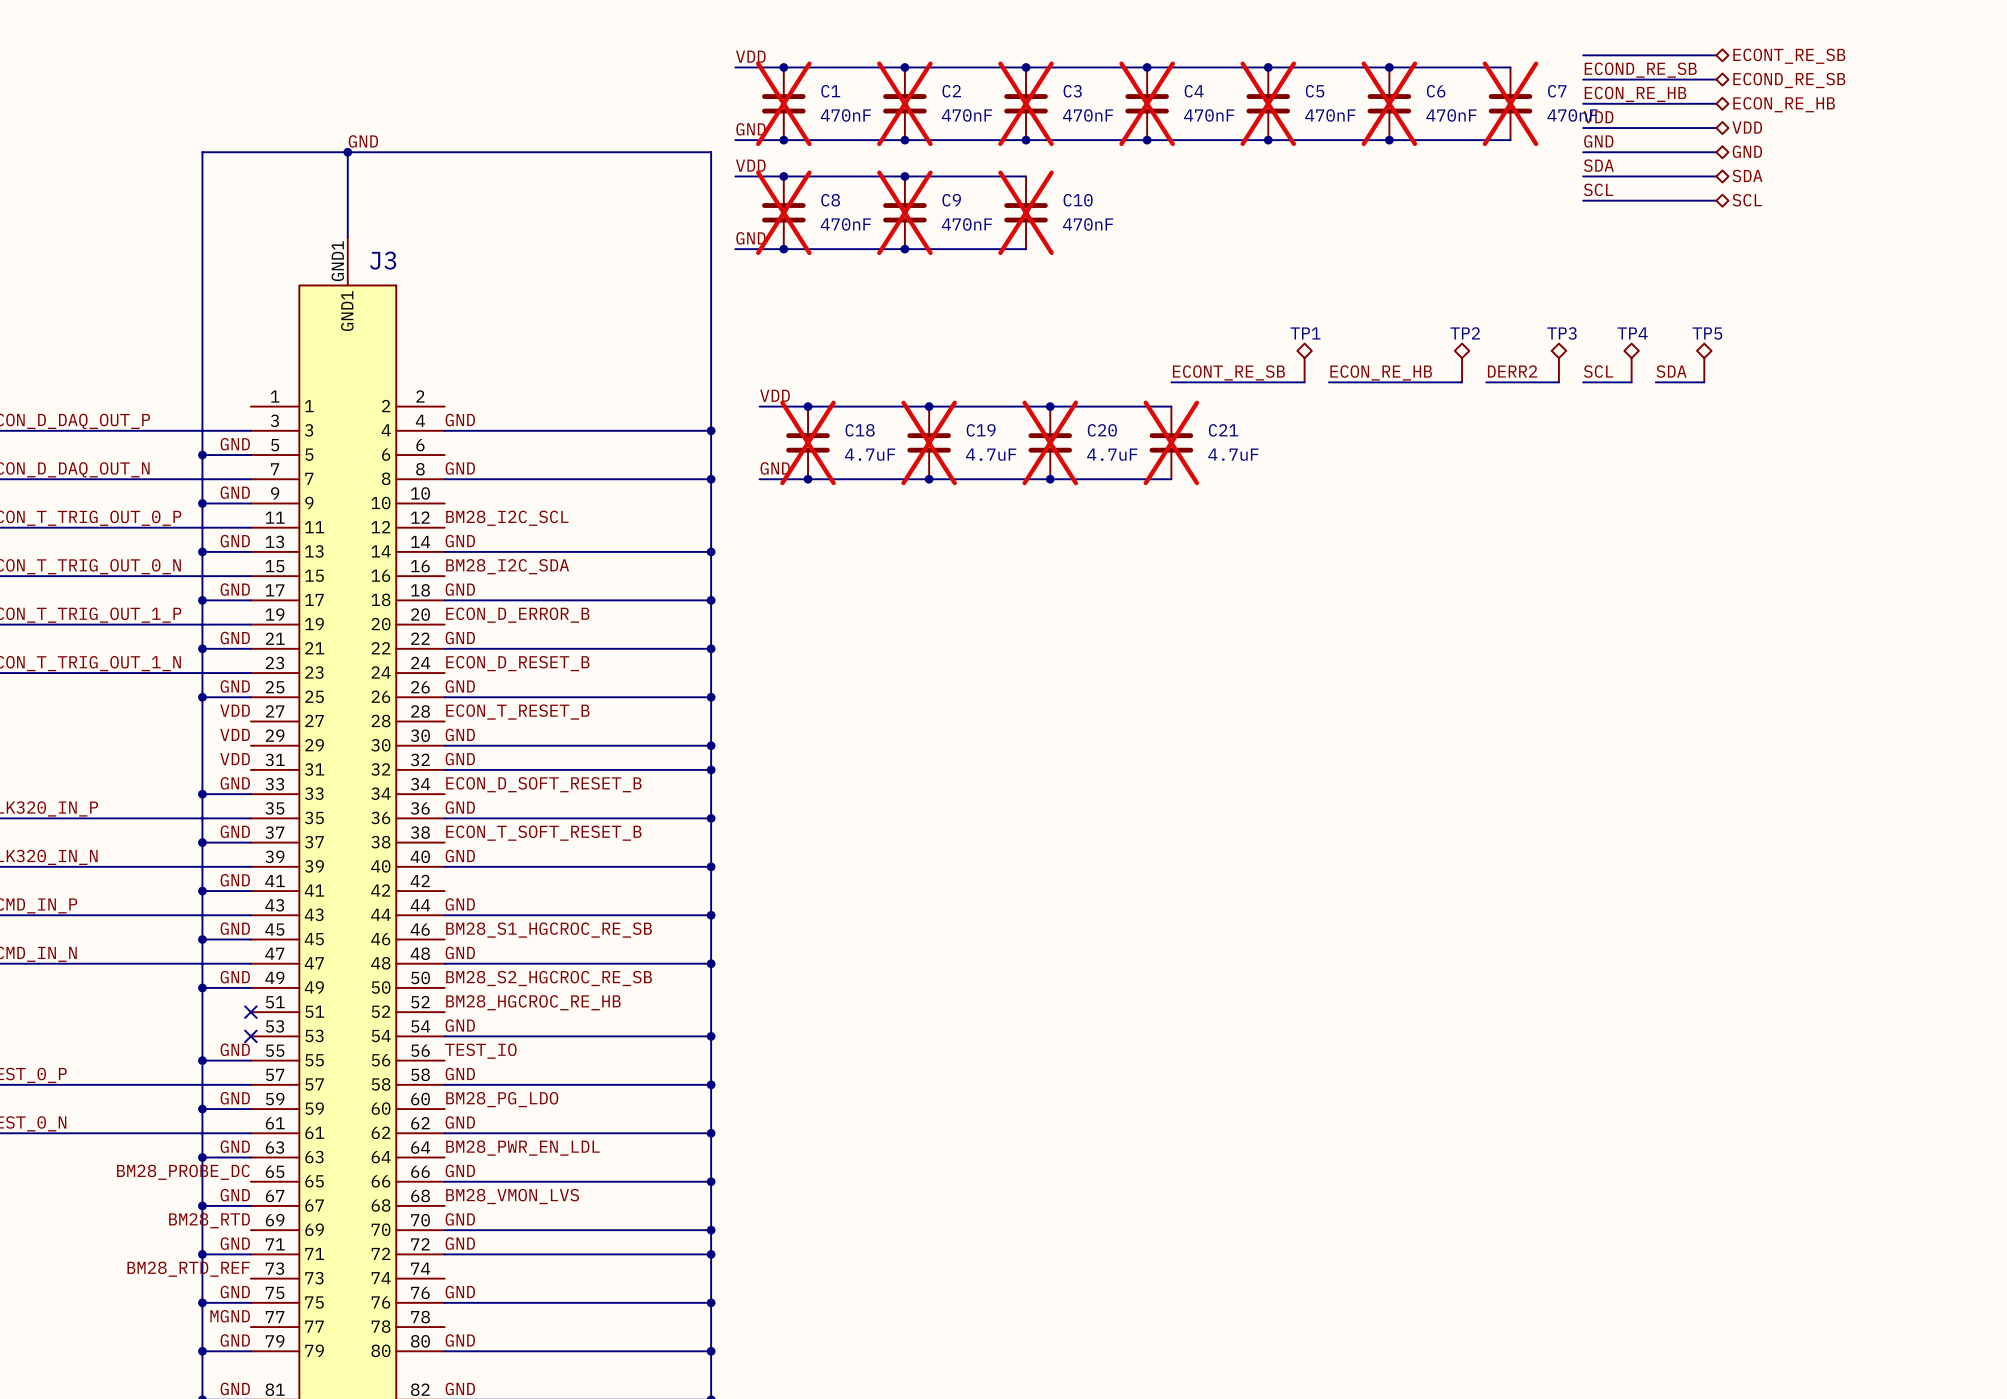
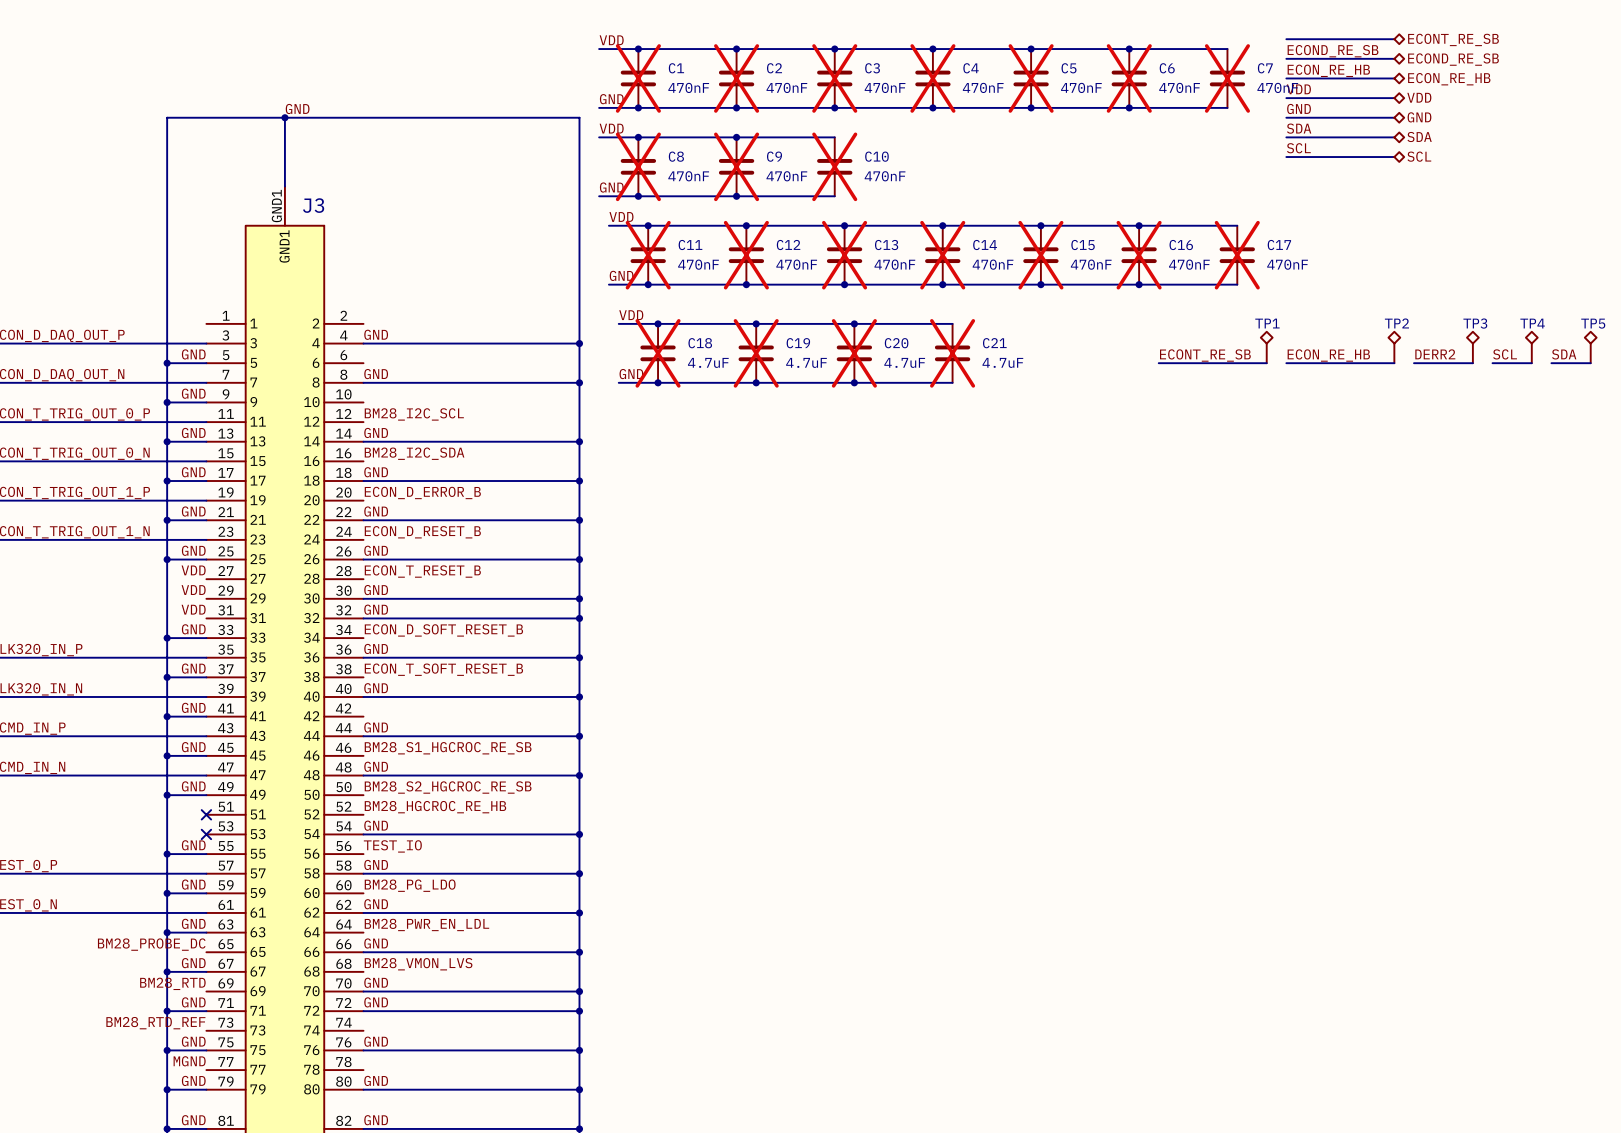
label: none -> VDD (621, 216)
wire: none -> (608, 225) (1237, 225)
junction: none -> (648, 225)
junction: none -> (746, 225)
junction: none -> (844, 225)
junction: none -> (942, 225)
junction: none -> (1040, 225)
junction: none -> (1139, 225)
C11: none -> 470nF (648, 255)
C12: none -> 470nF (746, 255)
C13: none -> 470nF (844, 255)
C14: none -> 470nF (942, 255)
C15: none -> 470nF (1040, 255)
C16: none -> 470nF (1139, 255)
C17: none -> 470nF (1237, 255)
label: none -> GND (621, 275)
wire: none -> (608, 284) (1237, 284)
junction: none -> (648, 284)
junction: none -> (746, 284)
junction: none -> (844, 284)
junction: none -> (942, 284)
junction: none -> (1040, 284)
junction: none -> (1139, 284)
TP1 position: (1304, 362) -> (1266, 347)
TP2 position: (1462, 362) -> (1394, 347)
TP3 position: (1558, 362) -> (1472, 347)
TP4 position: (1631, 362) -> (1531, 347)
TP5 position: (1704, 362) -> (1590, 347)
label: DERR2 (1512, 371) -> none
label: SCL (1598, 371) -> none
label: SDA (1671, 371) -> none
label: ECONT_RE_SB (1228, 372) -> none
label: ECON_RE_HB (1381, 372) -> none
wire: (1171, 382) (1304, 382) -> none
wire: (1328, 382) (1462, 382) -> (1158, 363) (1266, 363)
wire: (1486, 382) (1558, 382) -> none
wire: (1583, 382) (1631, 382) -> none
wire: (1655, 382) (1704, 382) -> (1492, 363) (1531, 363)
label: none -> DERR2 (1435, 354)
label: none -> SCL (1505, 354)
label: none -> SDA (1564, 354)
label: none -> ECONT_RE_SB (1205, 355)
label: none -> ECON_RE_HB (1328, 355)
wire: none -> (1286, 363) (1394, 363)
wire: none -> (1413, 363) (1472, 363)
wire: none -> (1551, 363) (1590, 363)

